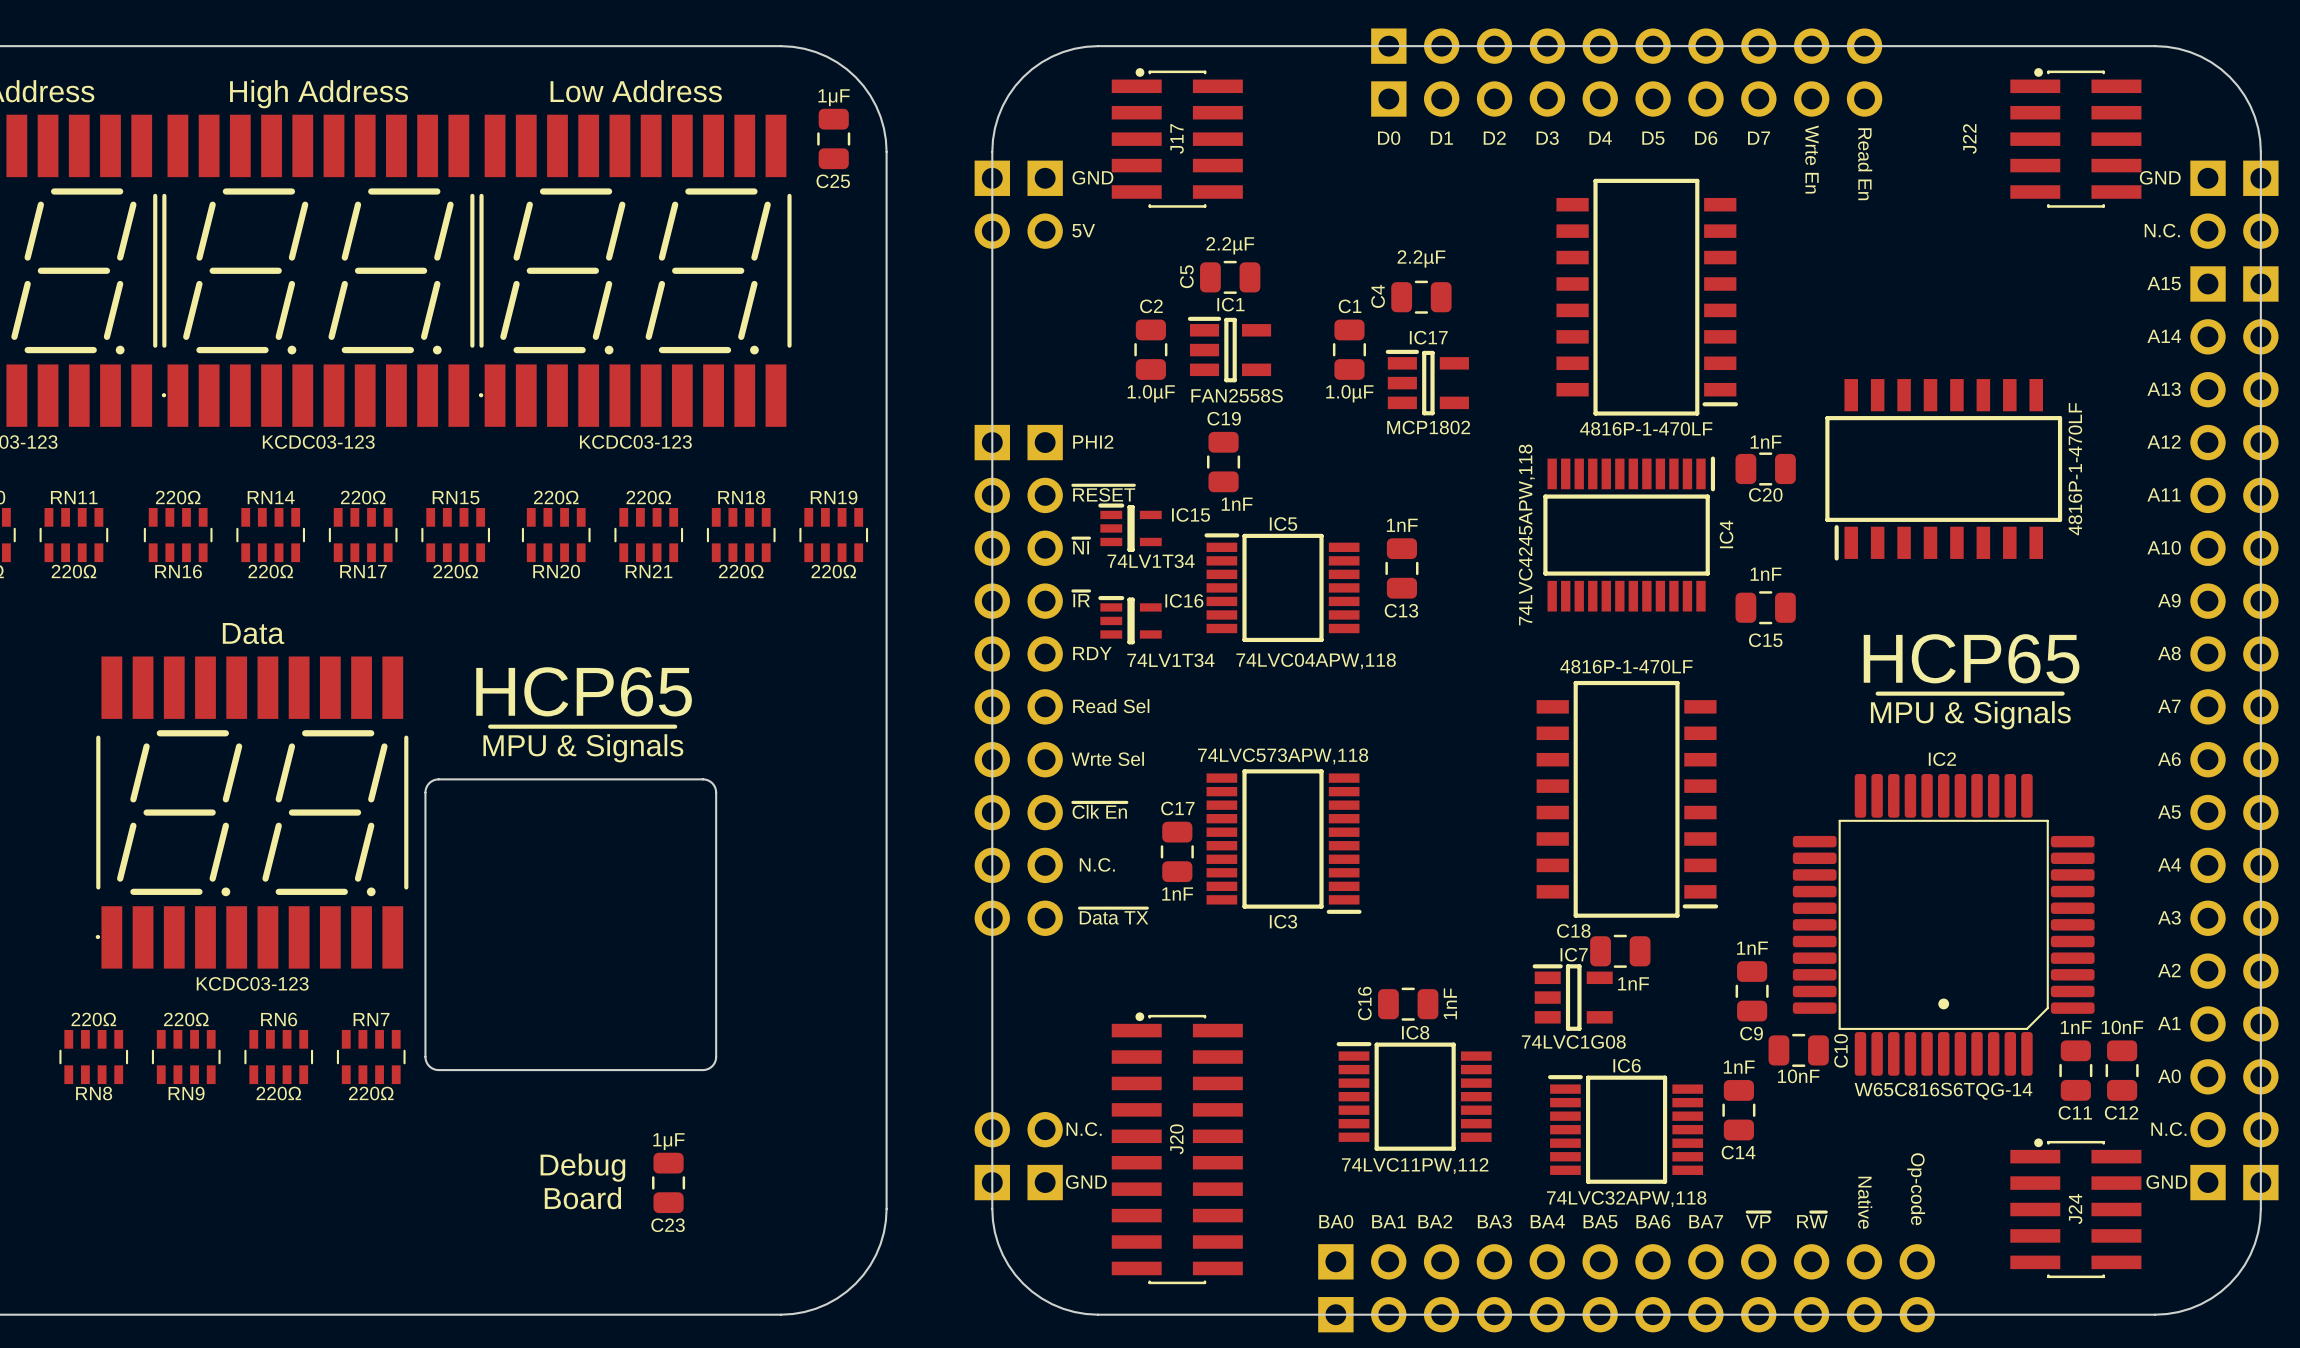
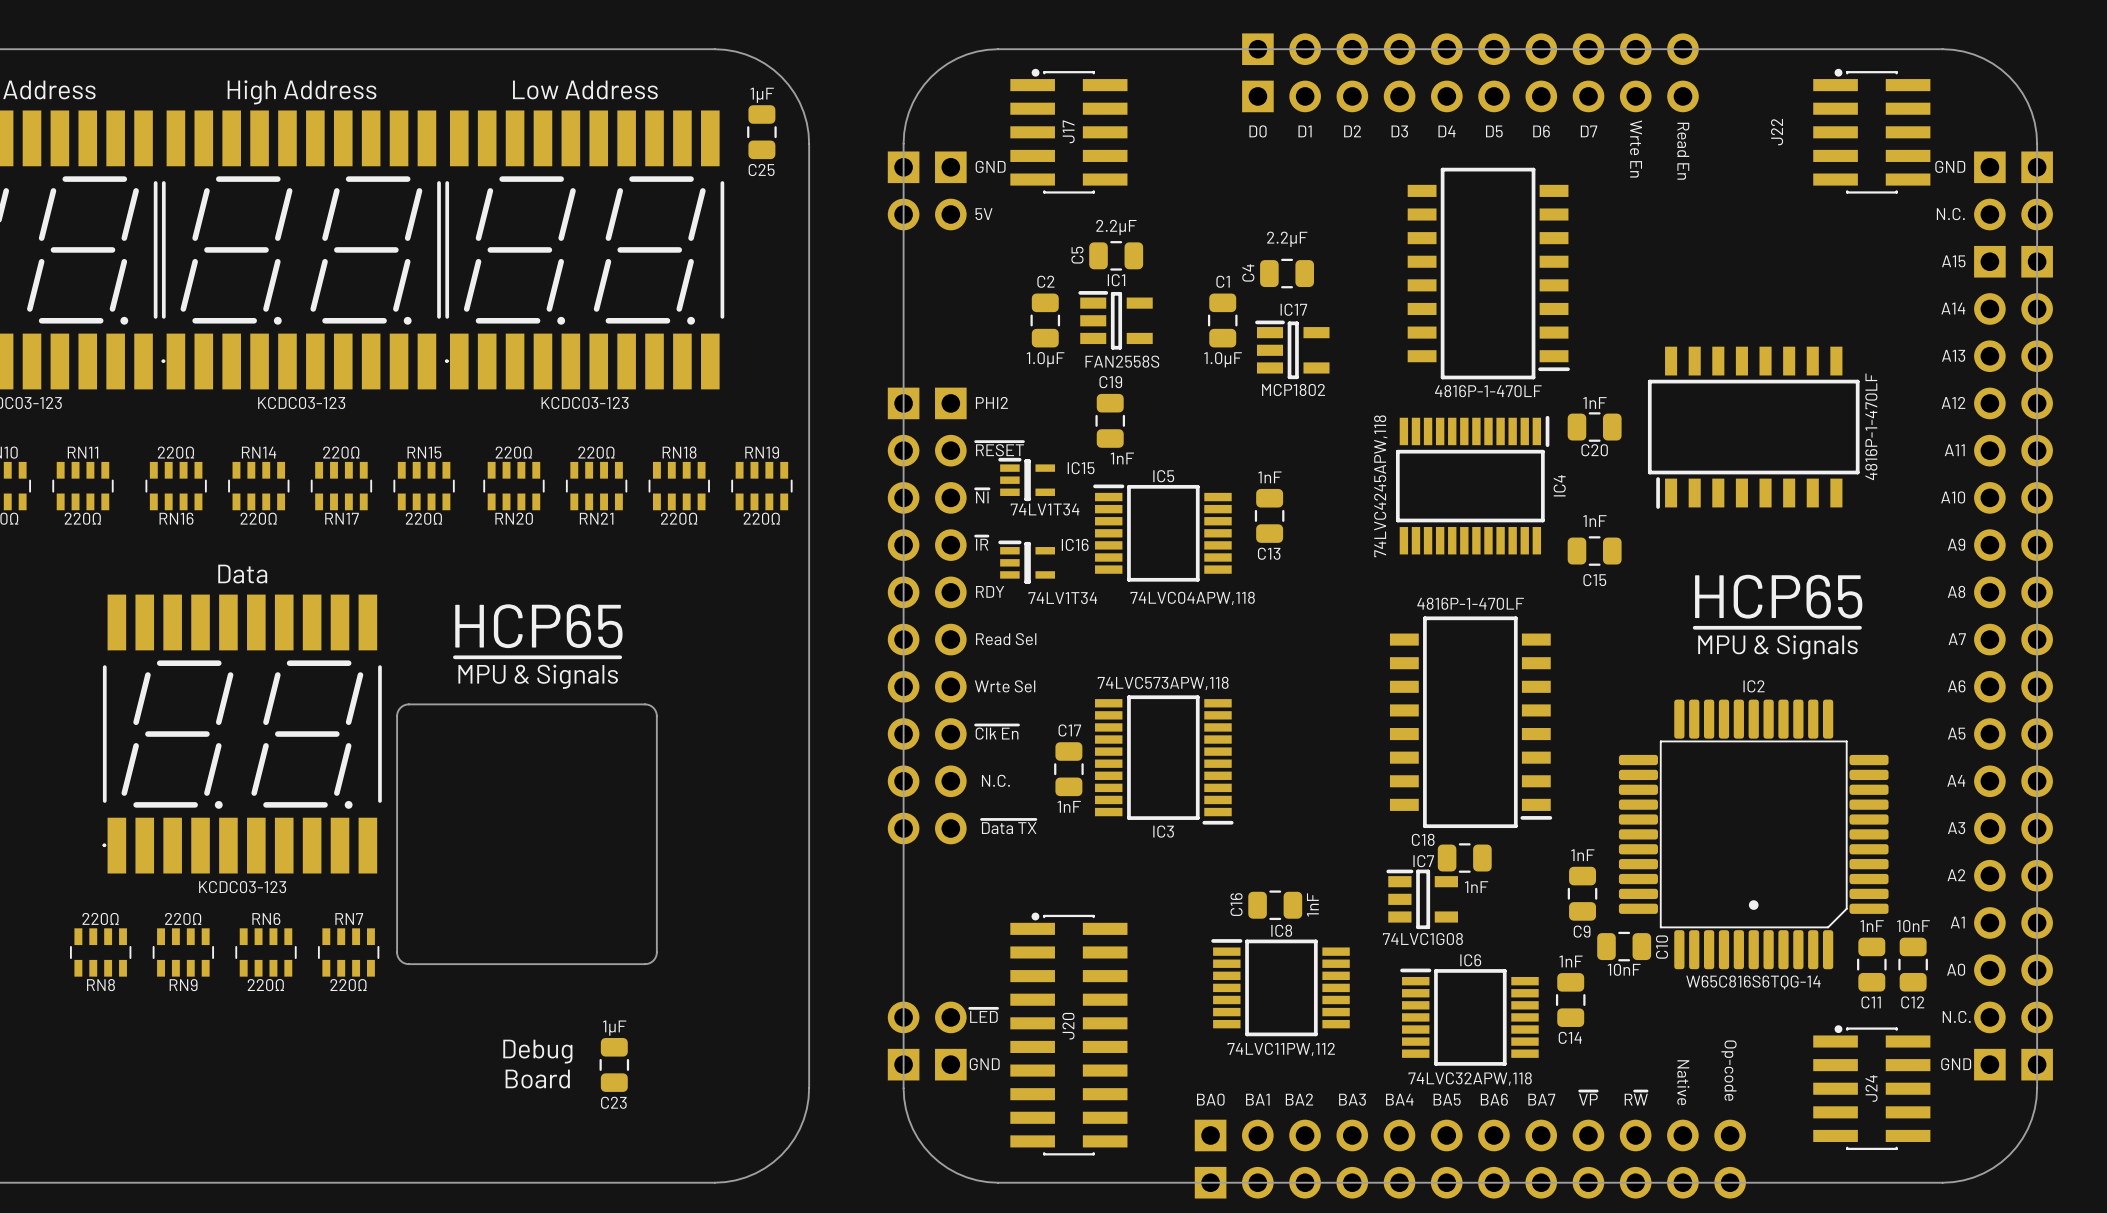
text: N.C. (1084, 1129) -> ~{LED} (983, 1015)

